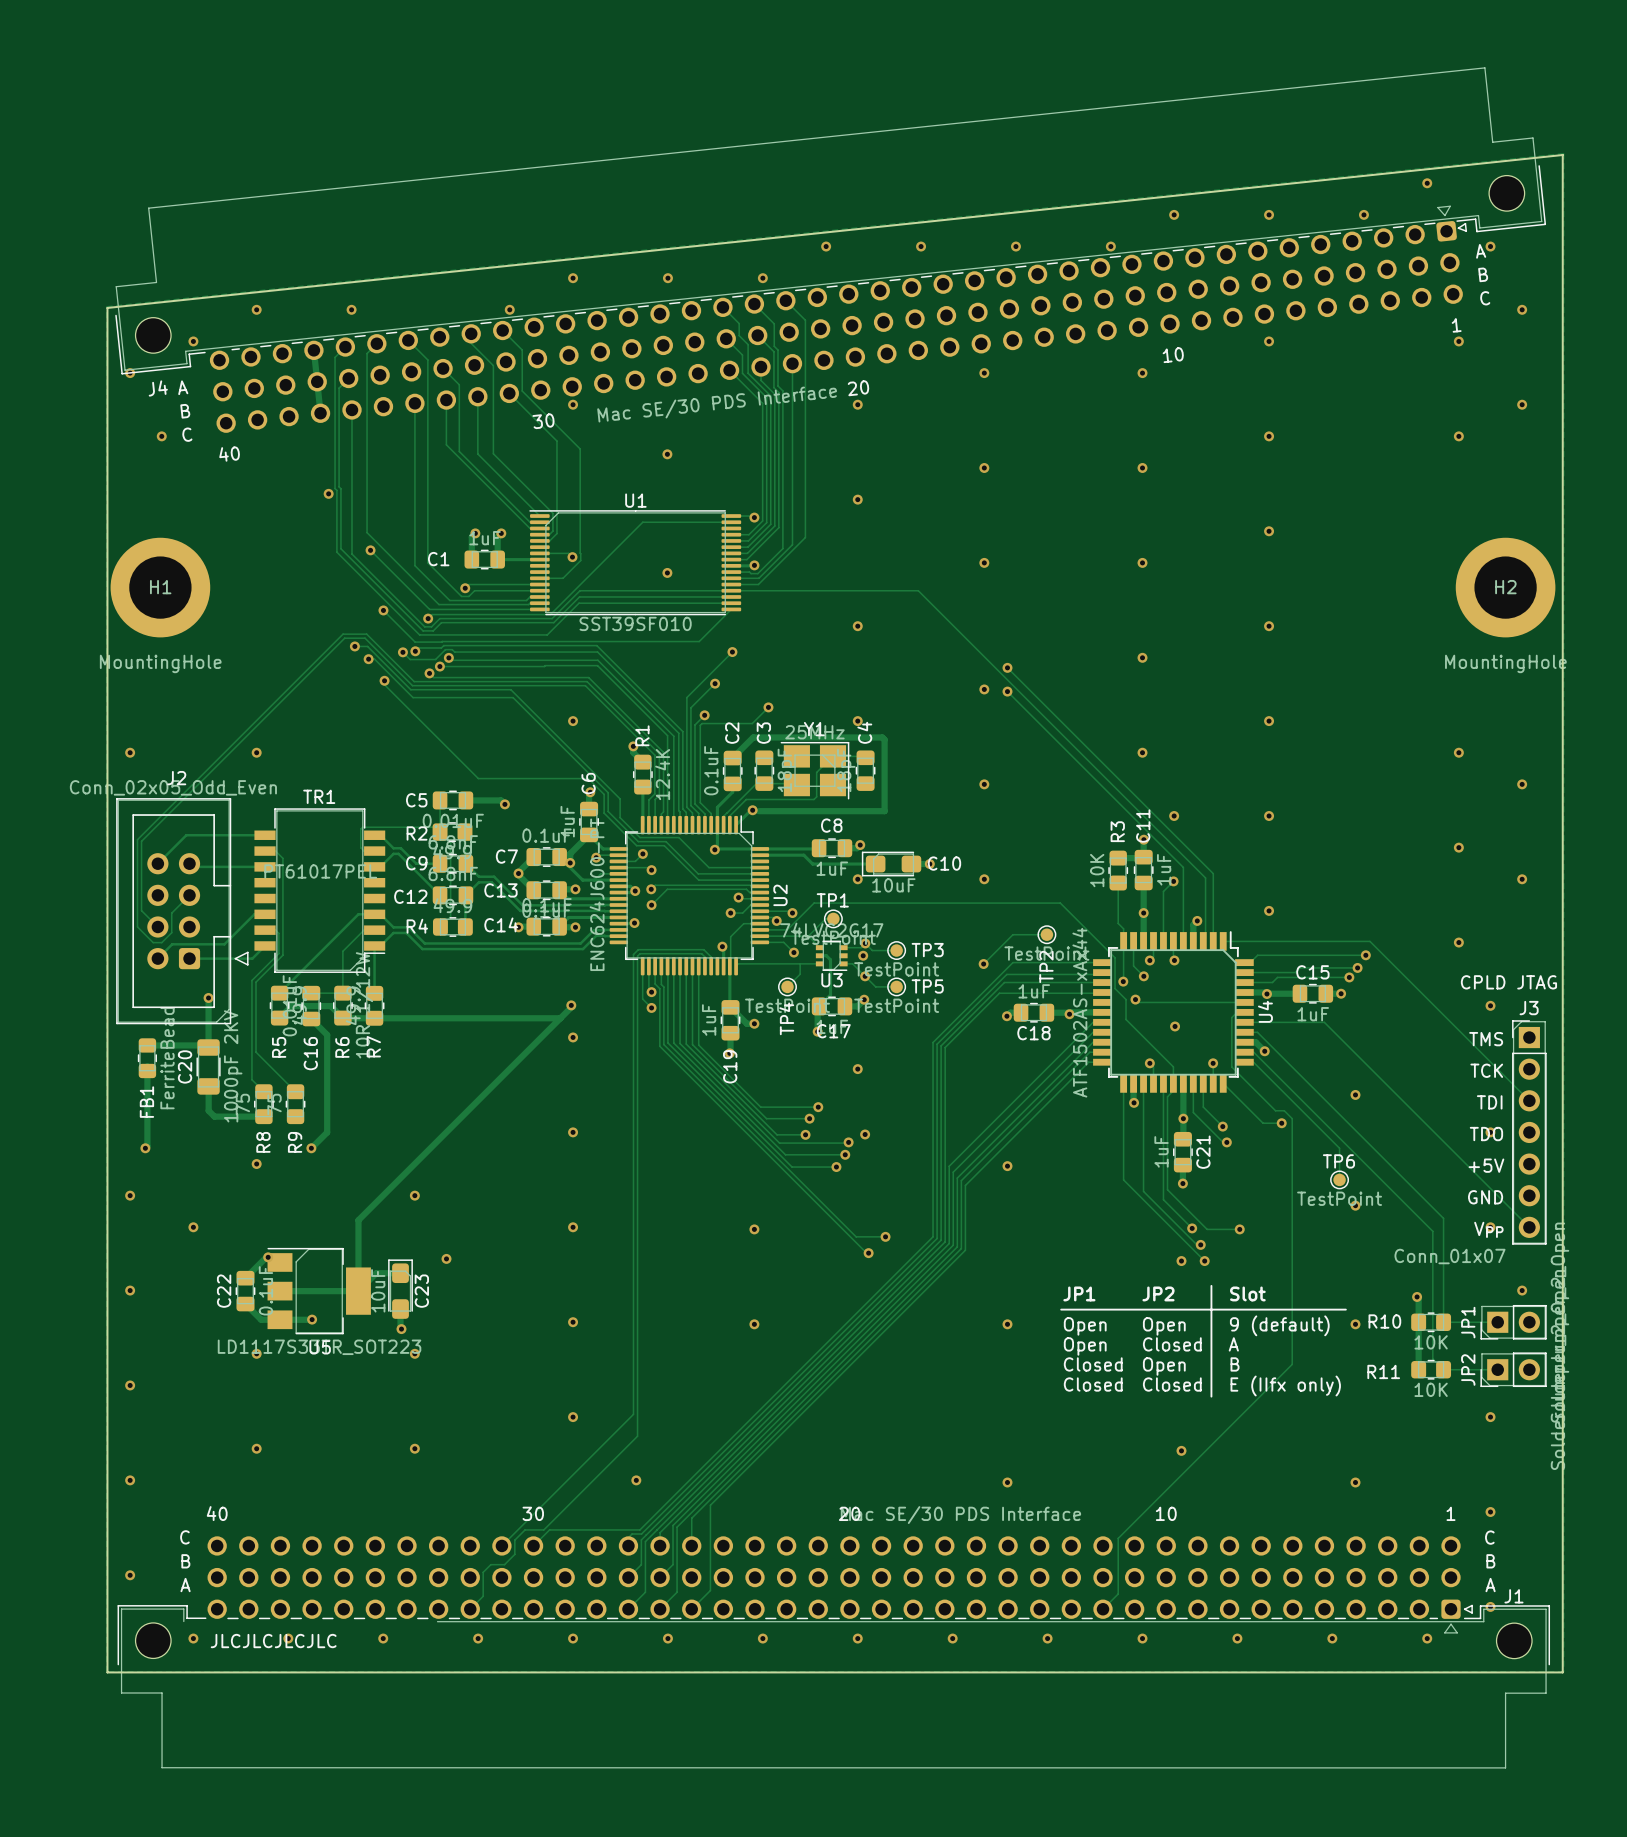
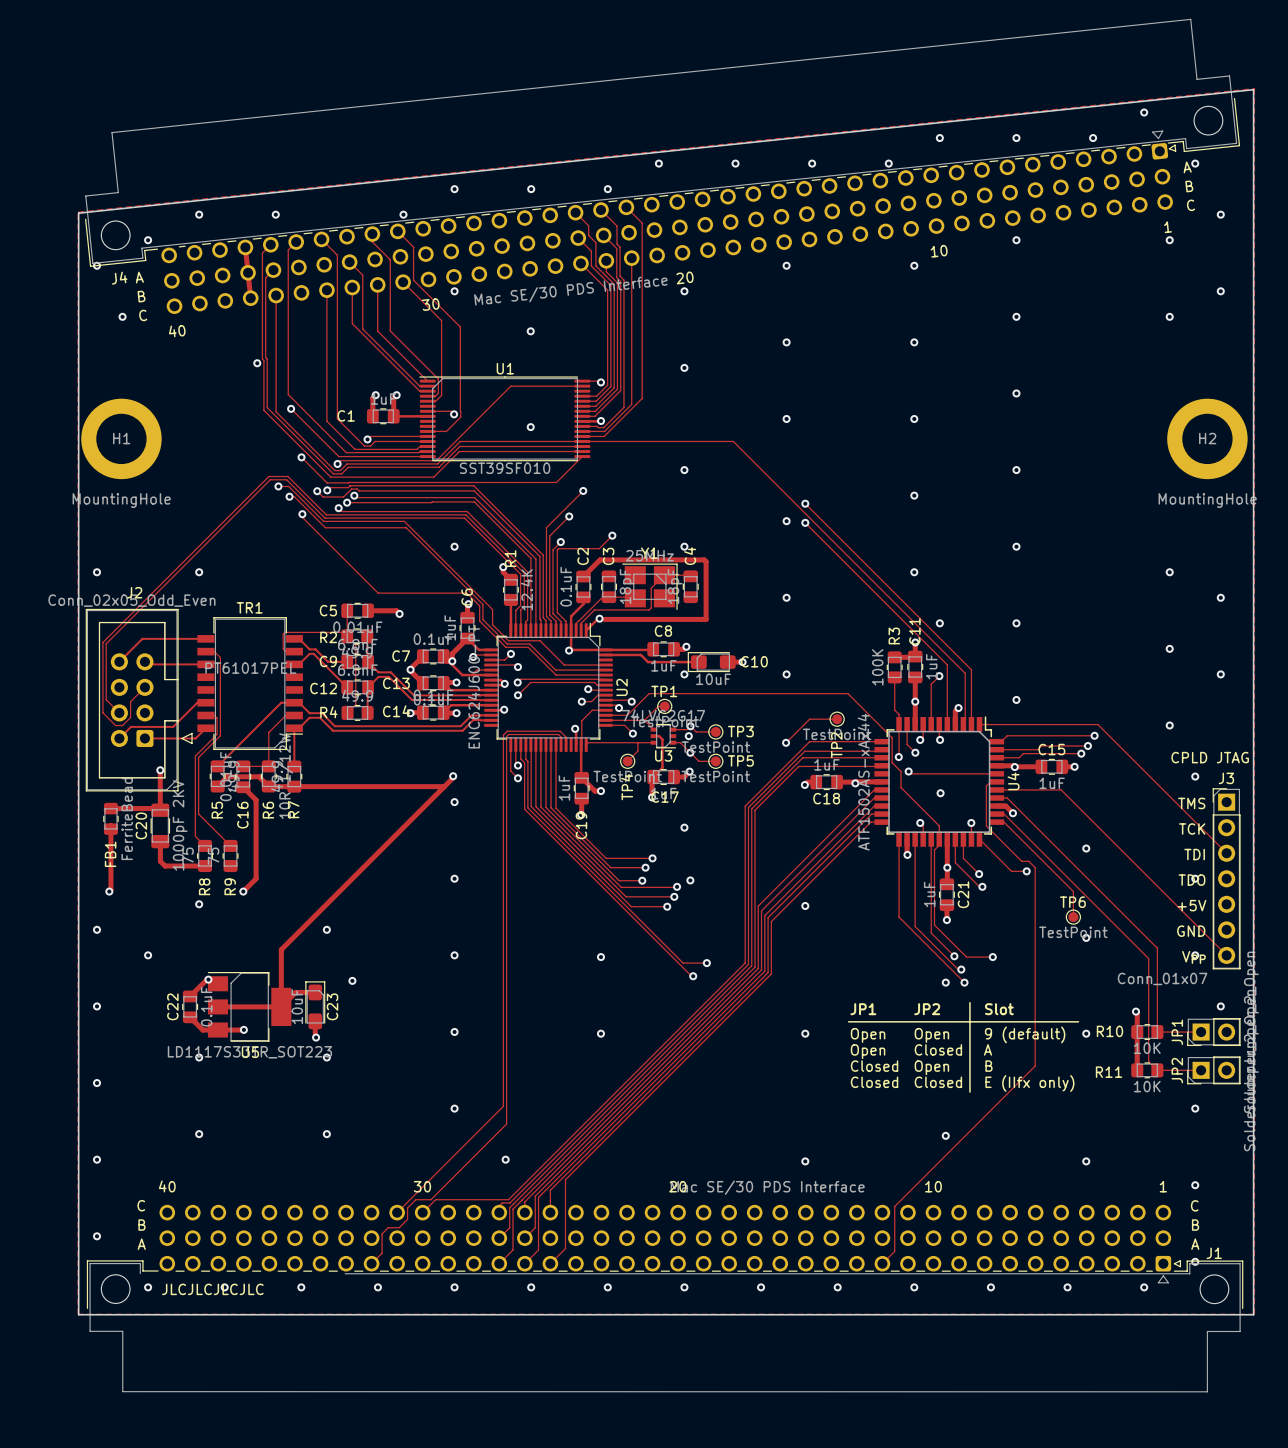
R3 value: 10K (1097, 870) -> 100K (877, 667)

